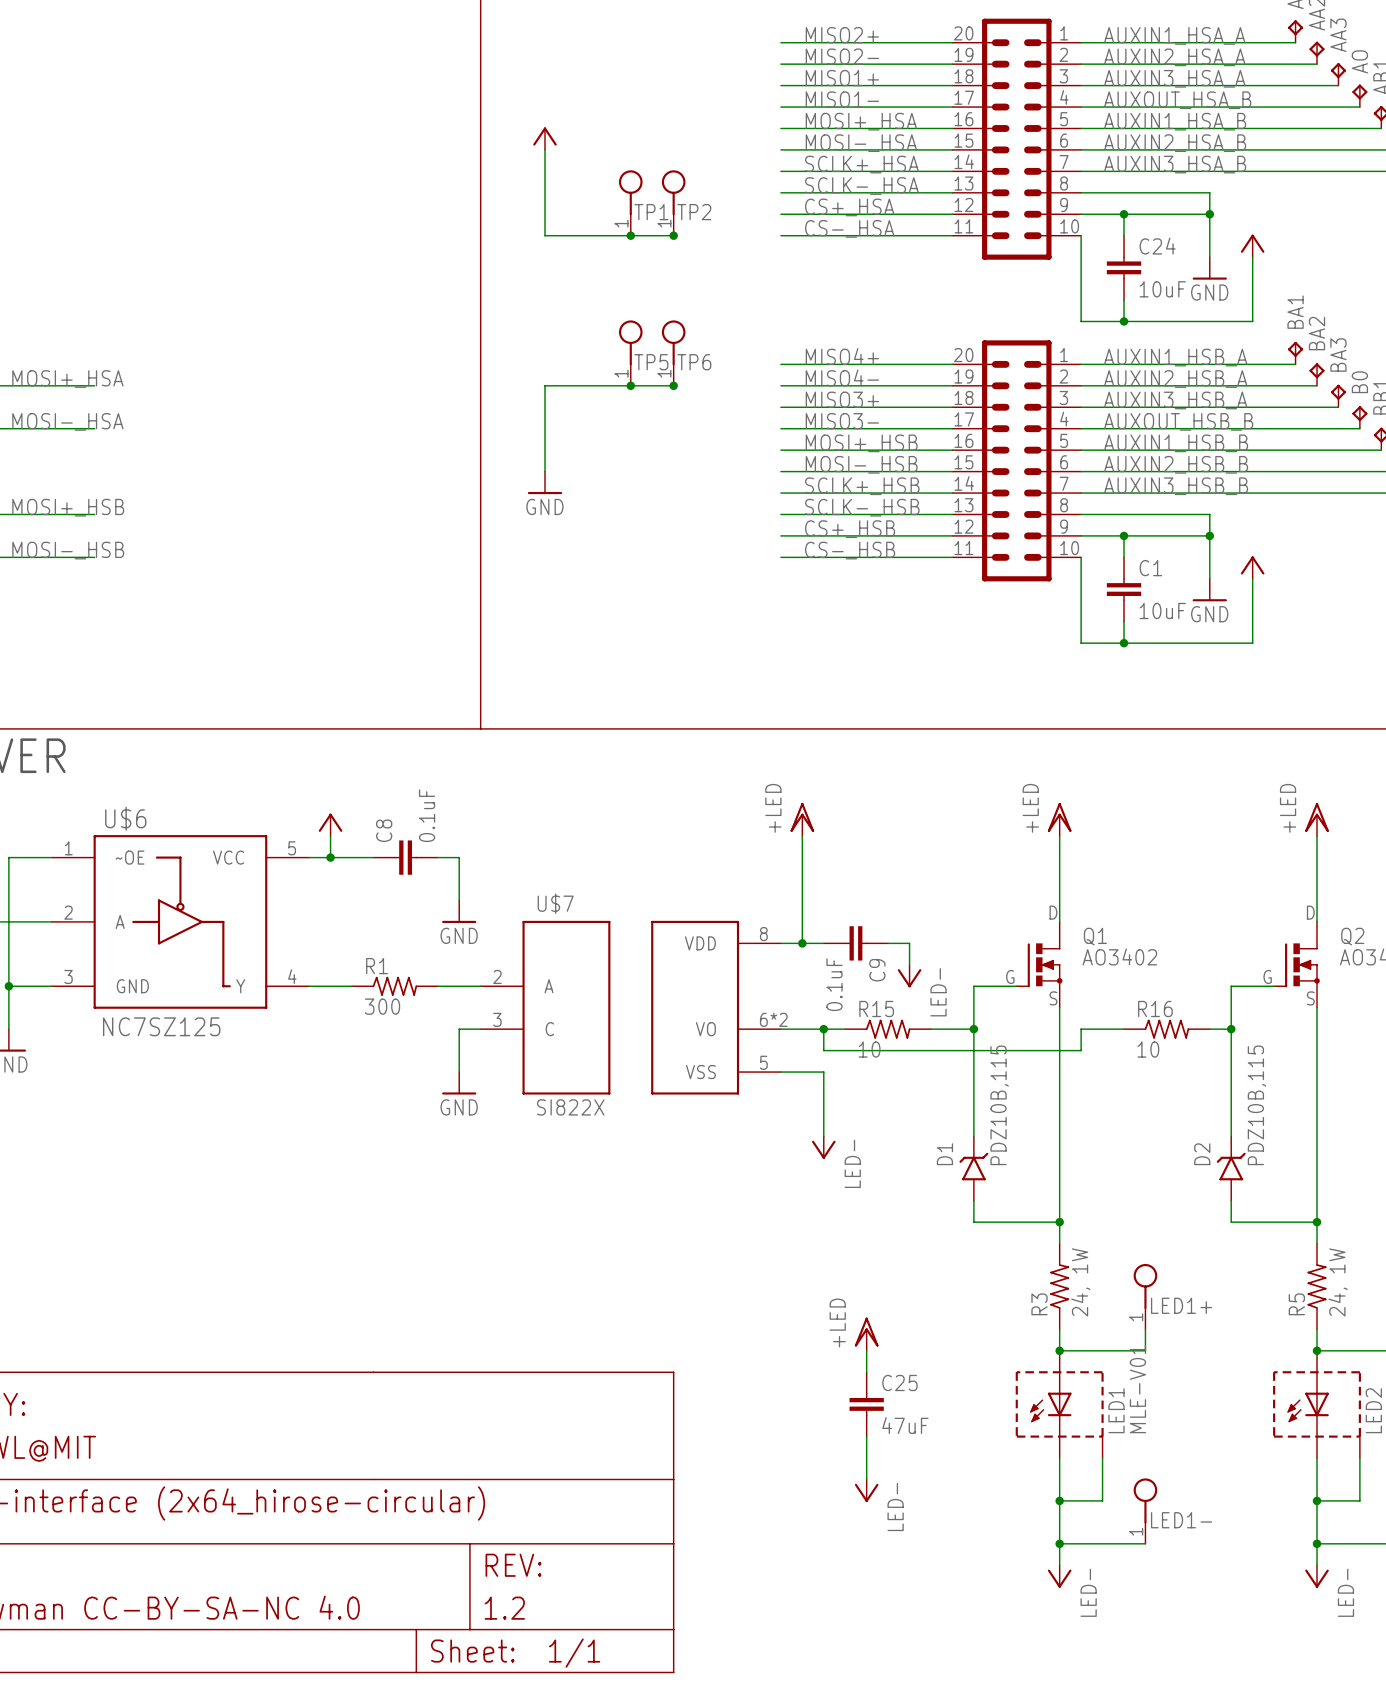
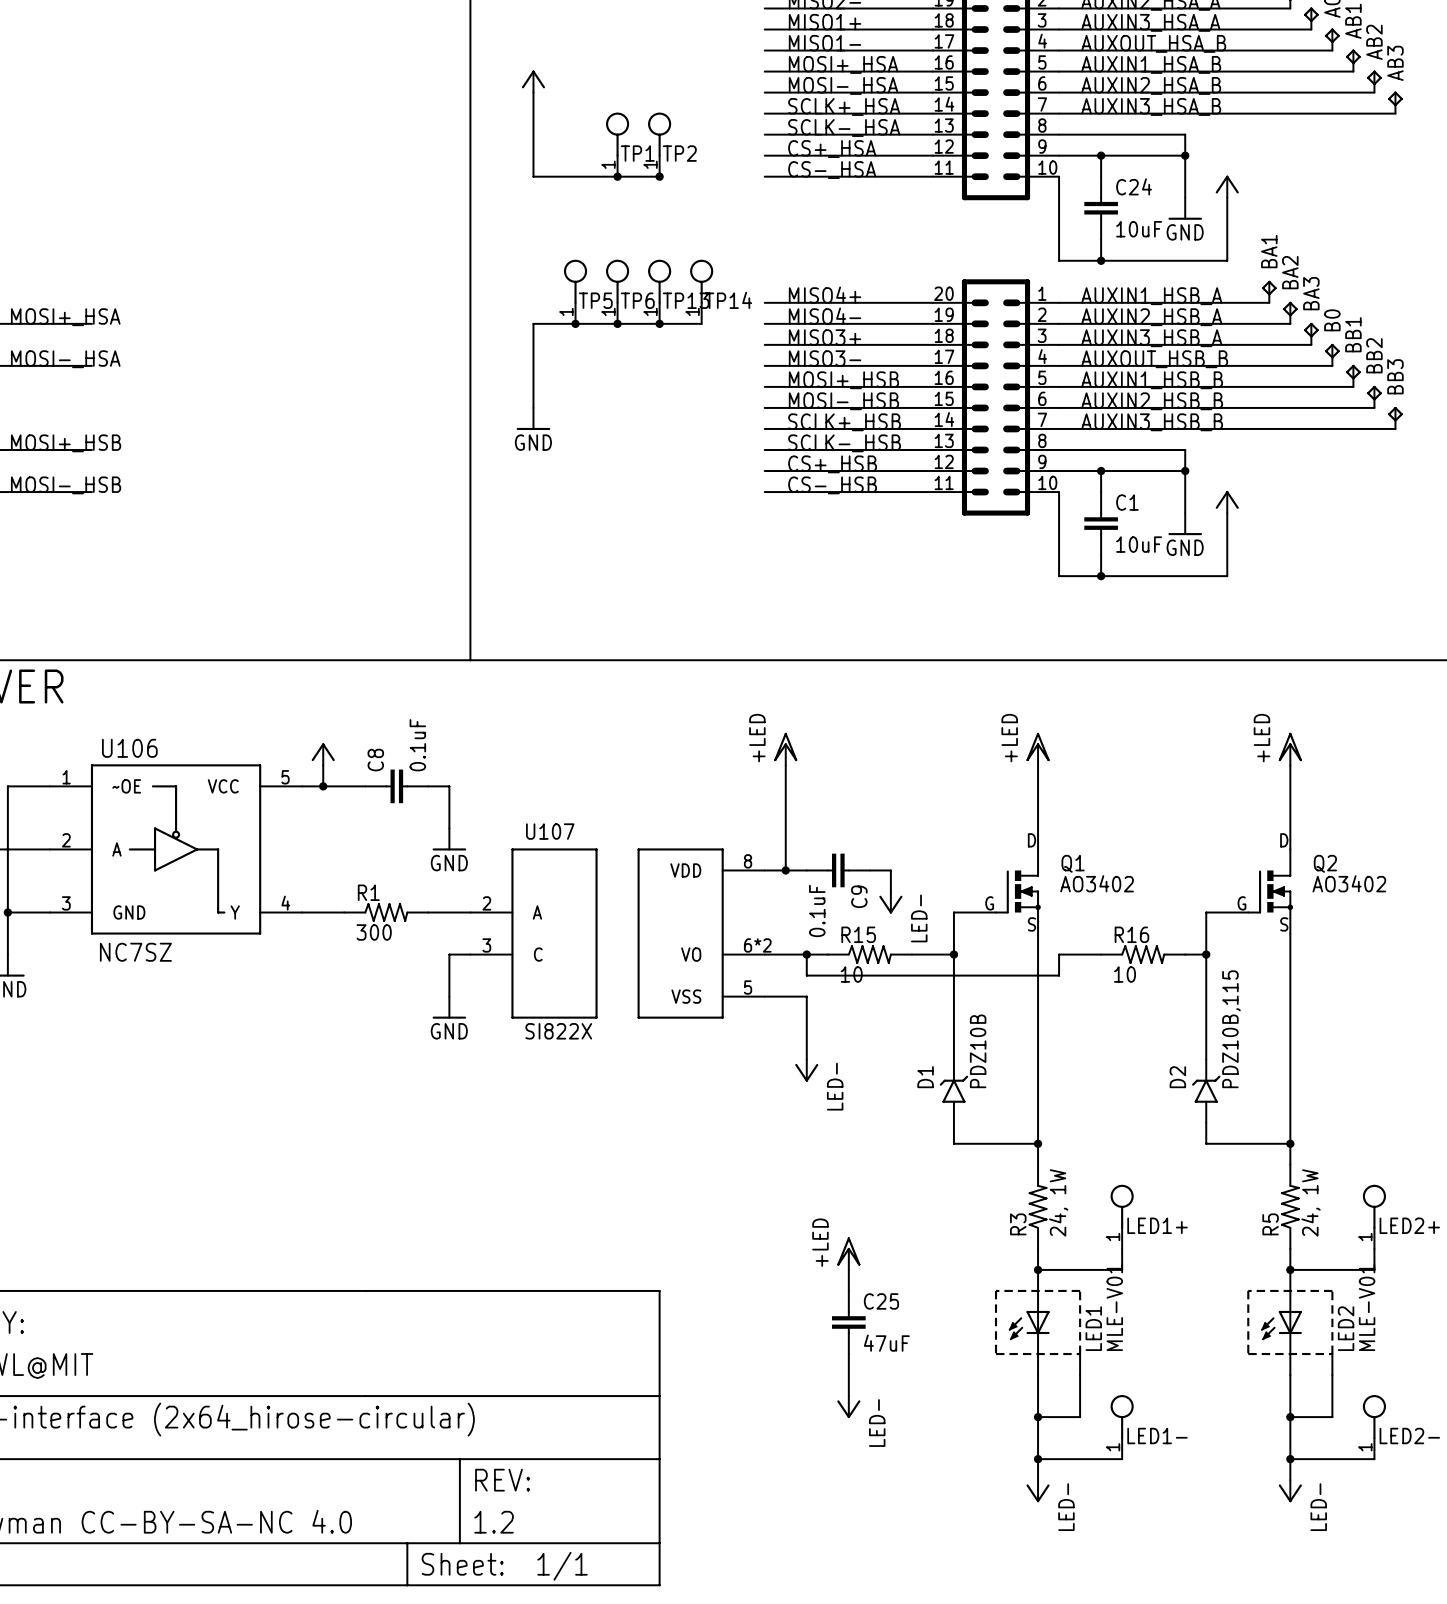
TP5: none -> (575, 291)
TP14: none -> (701, 291)
TP5 name: TP5 (651, 362) -> TP6 (637, 300)
TP6 name: TP6 (694, 362) -> TP13 (686, 300)
junction: none -> (575, 323)
wire: none -> (659, 323) (701, 323)
U$6 name: U$6 (125, 818) -> U106 (129, 748)
U$7 name: U$7 (555, 903) -> U107 (550, 831)
U$6 value: NC7SZ125 (161, 1026) -> NC7SZ (135, 952)
D1 value: PDZ10B,115 (999, 1105) -> PDZ10B (978, 1051)

